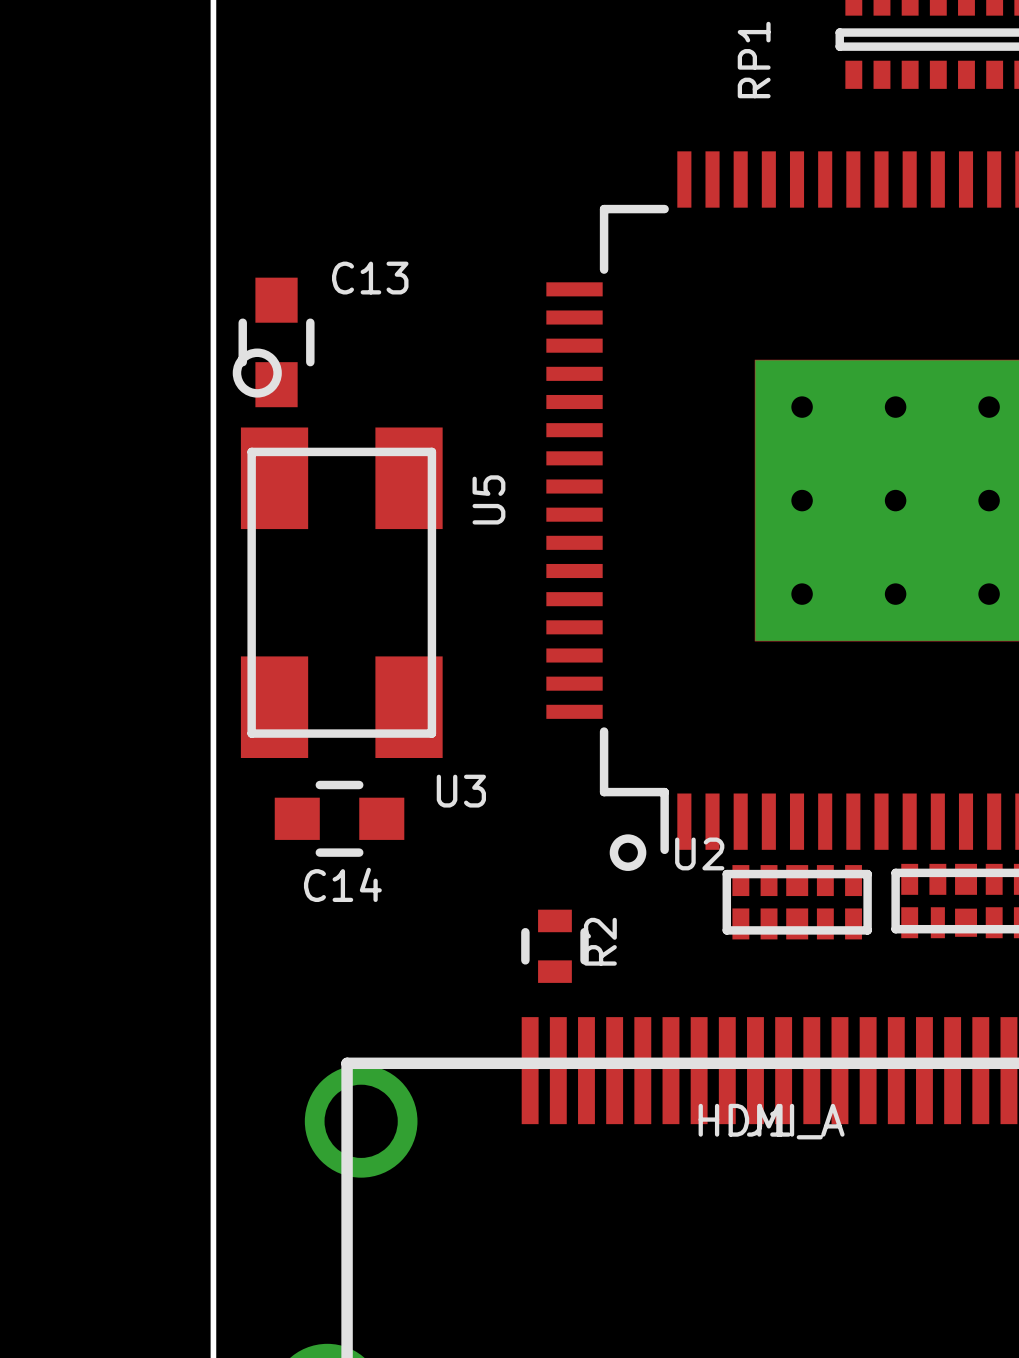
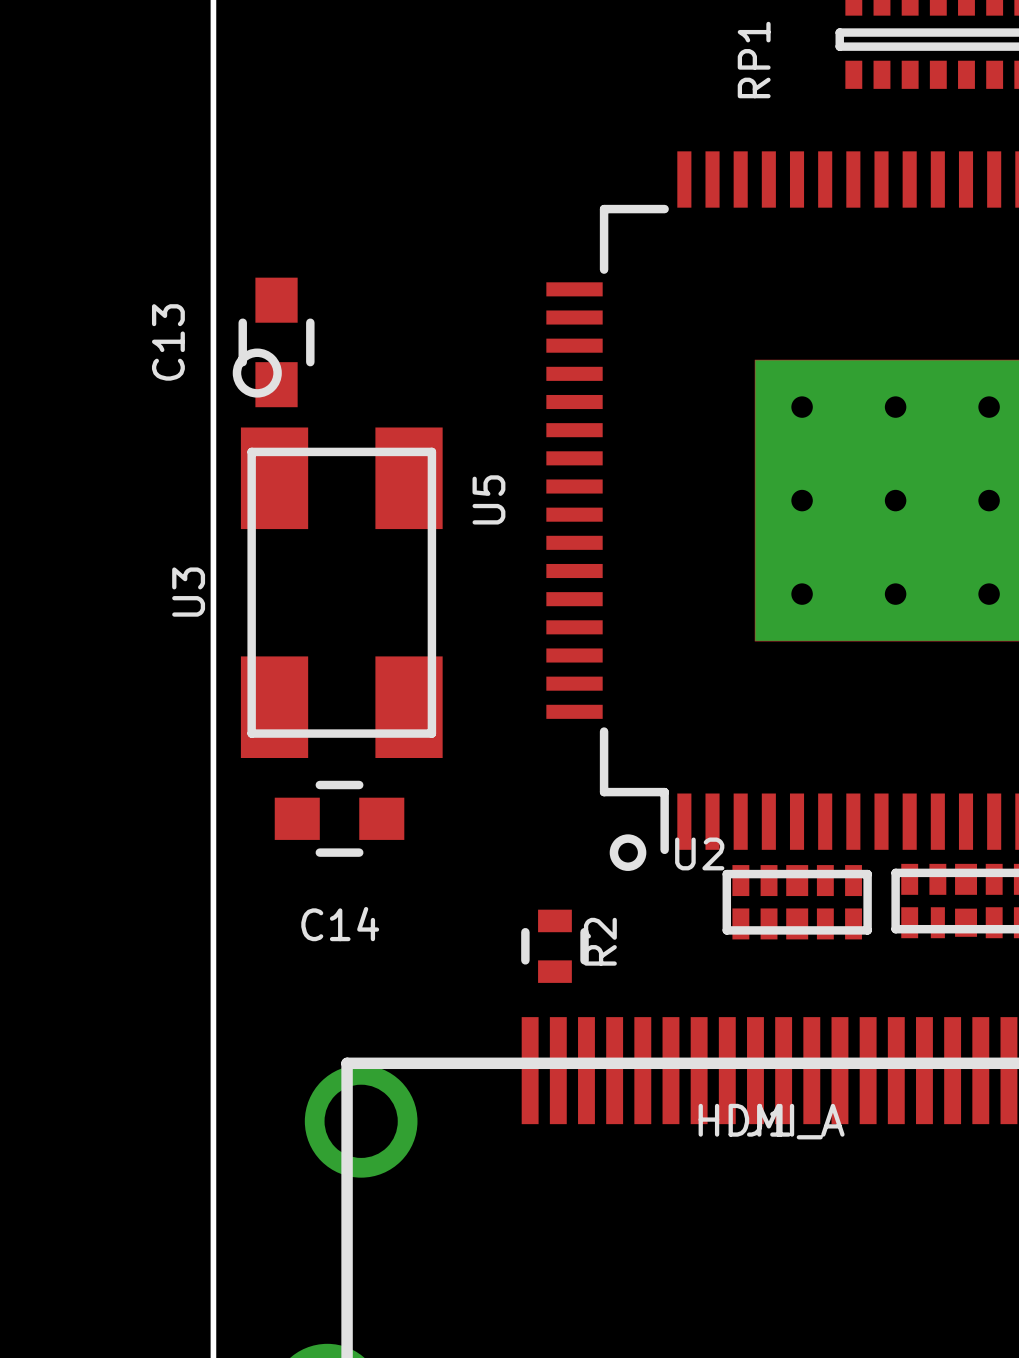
C13 name rotation: 0° (370, 278) -> 90° counterclockwise (168, 342)
C13 name position: C13 (370, 278) -> C13 (168, 342)
U3 name rotation: 0° (461, 791) -> 90° counterclockwise (188, 592)
U3 name position: U3 (461, 791) -> U3 (188, 592)
C14 name position: C14 (342, 884) -> C14 (340, 924)

